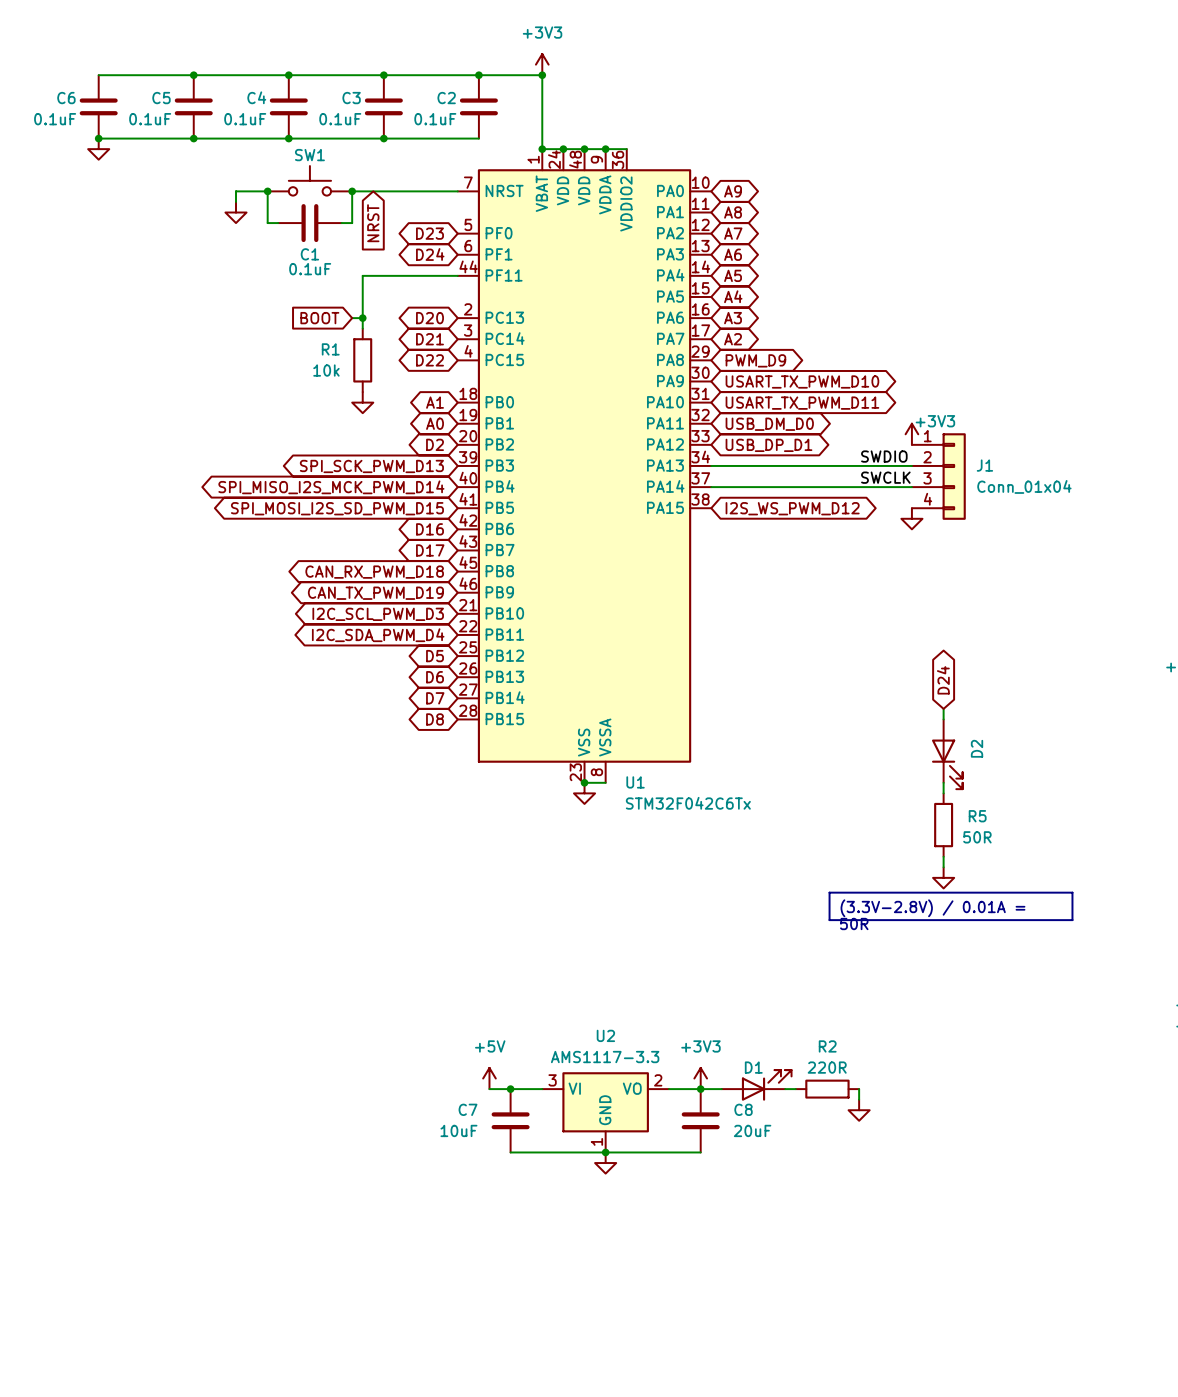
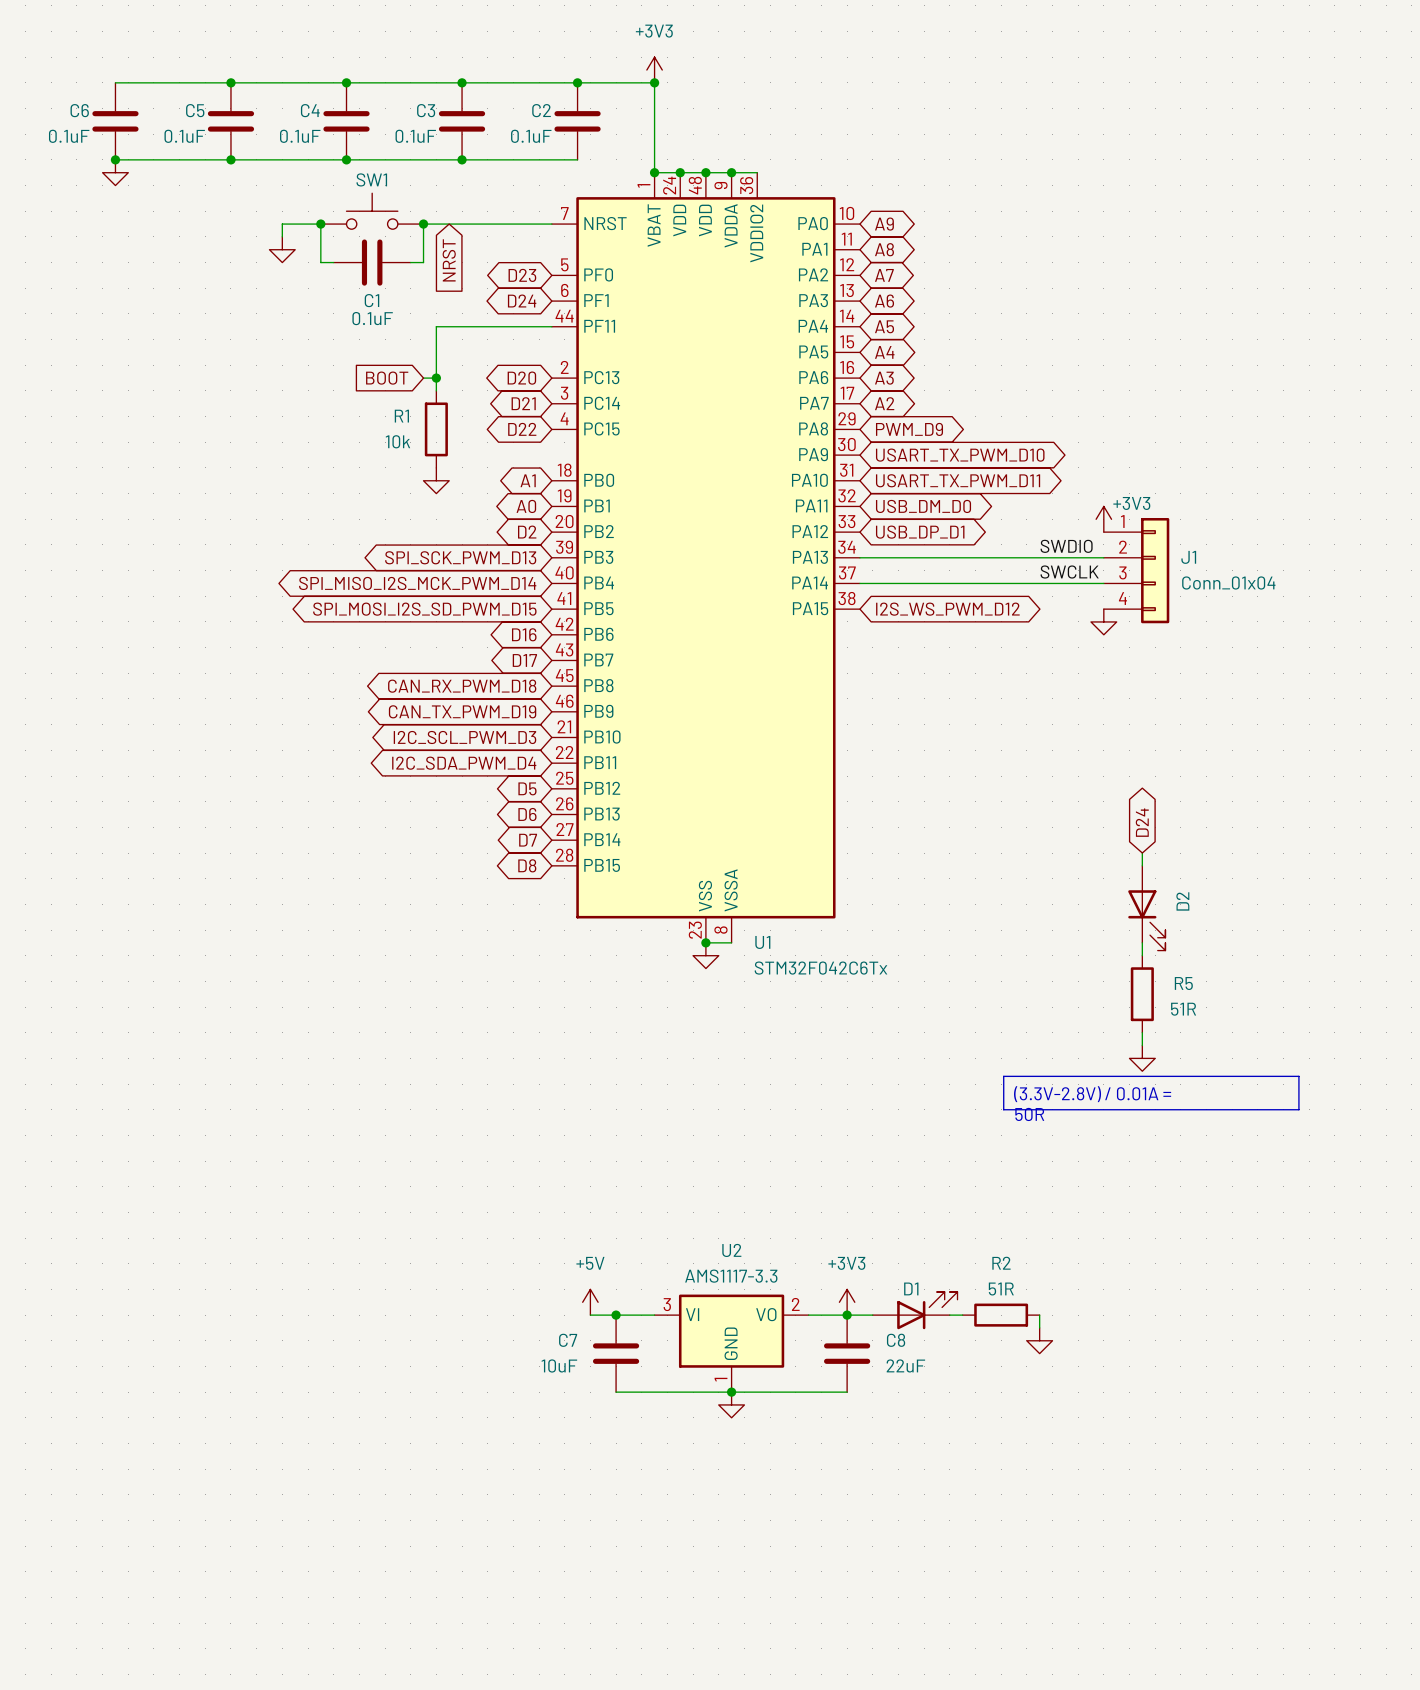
R5 value: 50R (977, 837) -> 51R (1183, 1009)
R2 value: 220R (827, 1067) -> 51R (1001, 1289)
C8 value: 20uF (752, 1130) -> 22uF (905, 1365)

